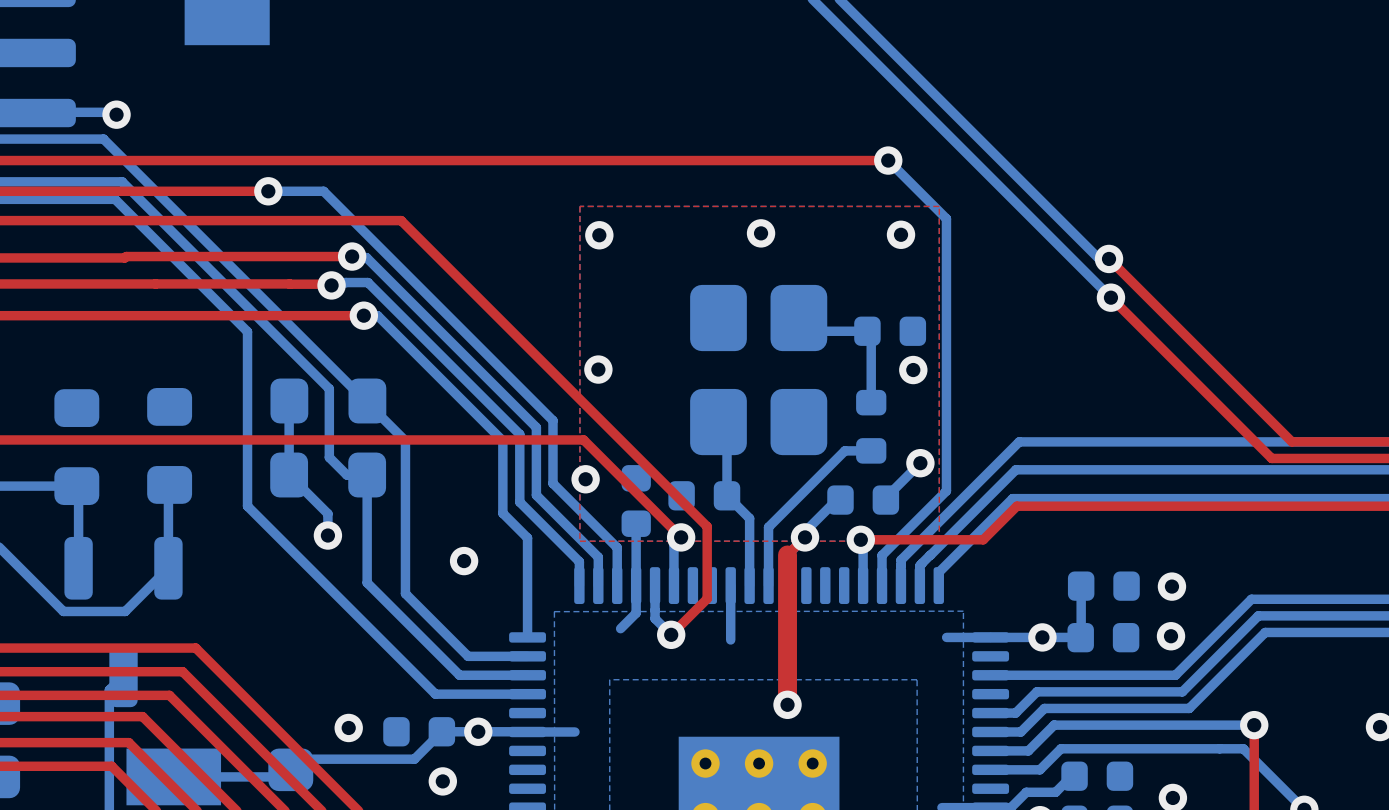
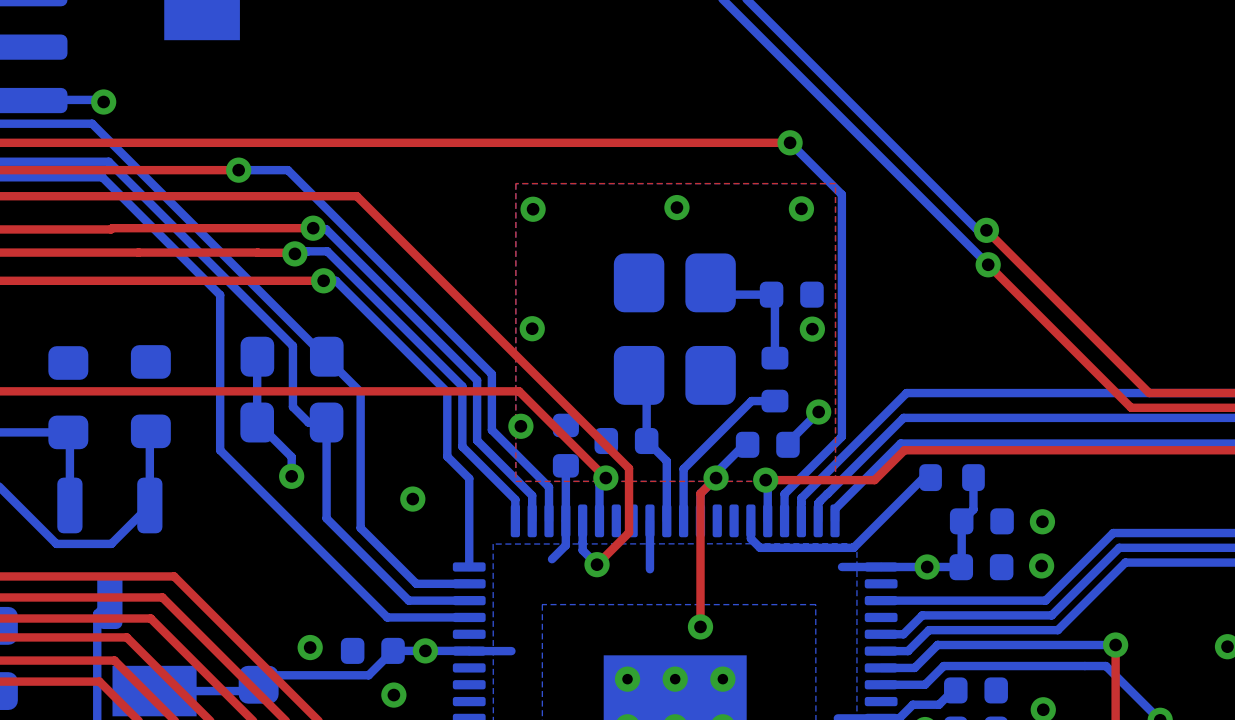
bottom track: none -> (930, 477) (923, 477) (853, 547) (760, 547) (750, 538) (750, 520)
part: none -> (952, 477)
bottom track: none -> (973, 477) (973, 509) (961, 521)
top track width: thick (787, 554) (787, 704) -> thin (700, 493) (700, 626)

